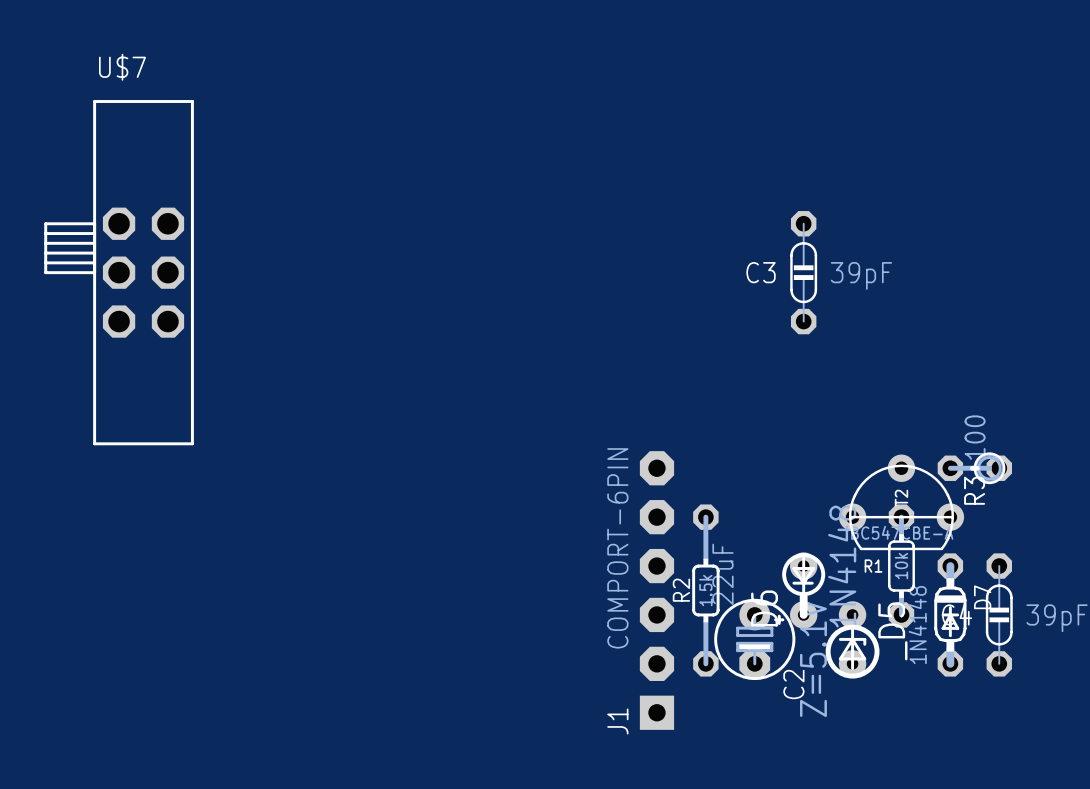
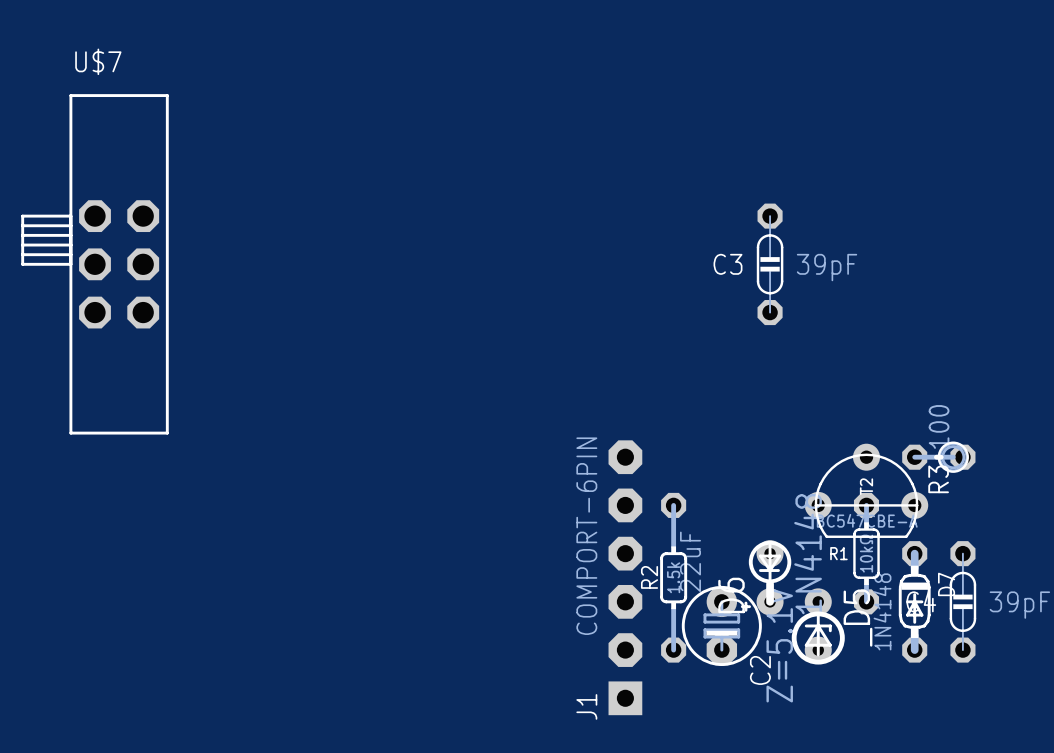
R1 value: 10k (901, 566) -> 10kΩ (866, 553)

